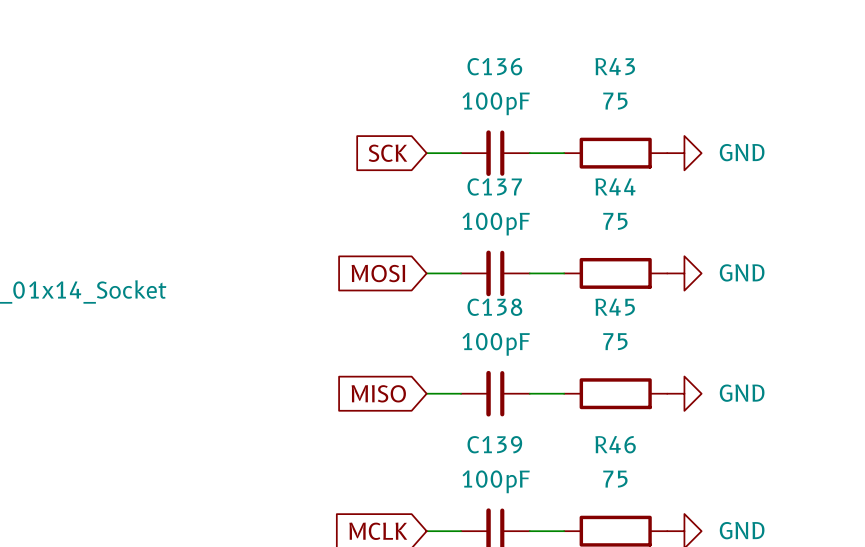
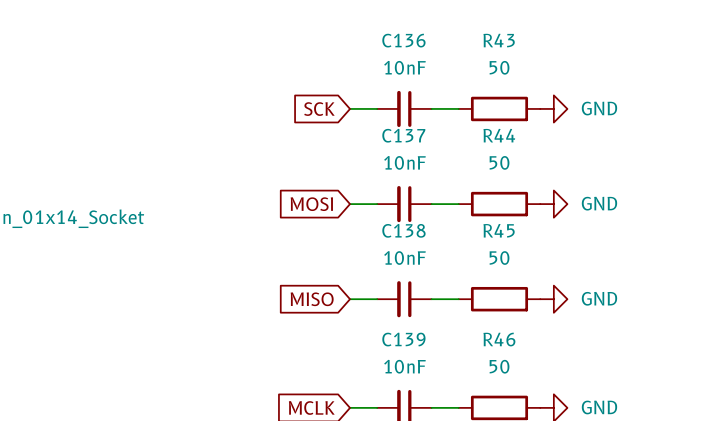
R43 value: 75 (615, 101) -> 50 (499, 67)
C136 value: 100pF (496, 103) -> 10nF (404, 67)
R44 value: 75 (615, 221) -> 50 (499, 162)
C137 value: 100pF (496, 224) -> 10nF (404, 162)
R45 value: 75 (615, 341) -> 50 (499, 258)
C138 value: 100pF (496, 344) -> 10nF (404, 258)
R46 value: 75 (615, 479) -> 50 (499, 366)
C139 value: 100pF (496, 481) -> 10nF (404, 366)

